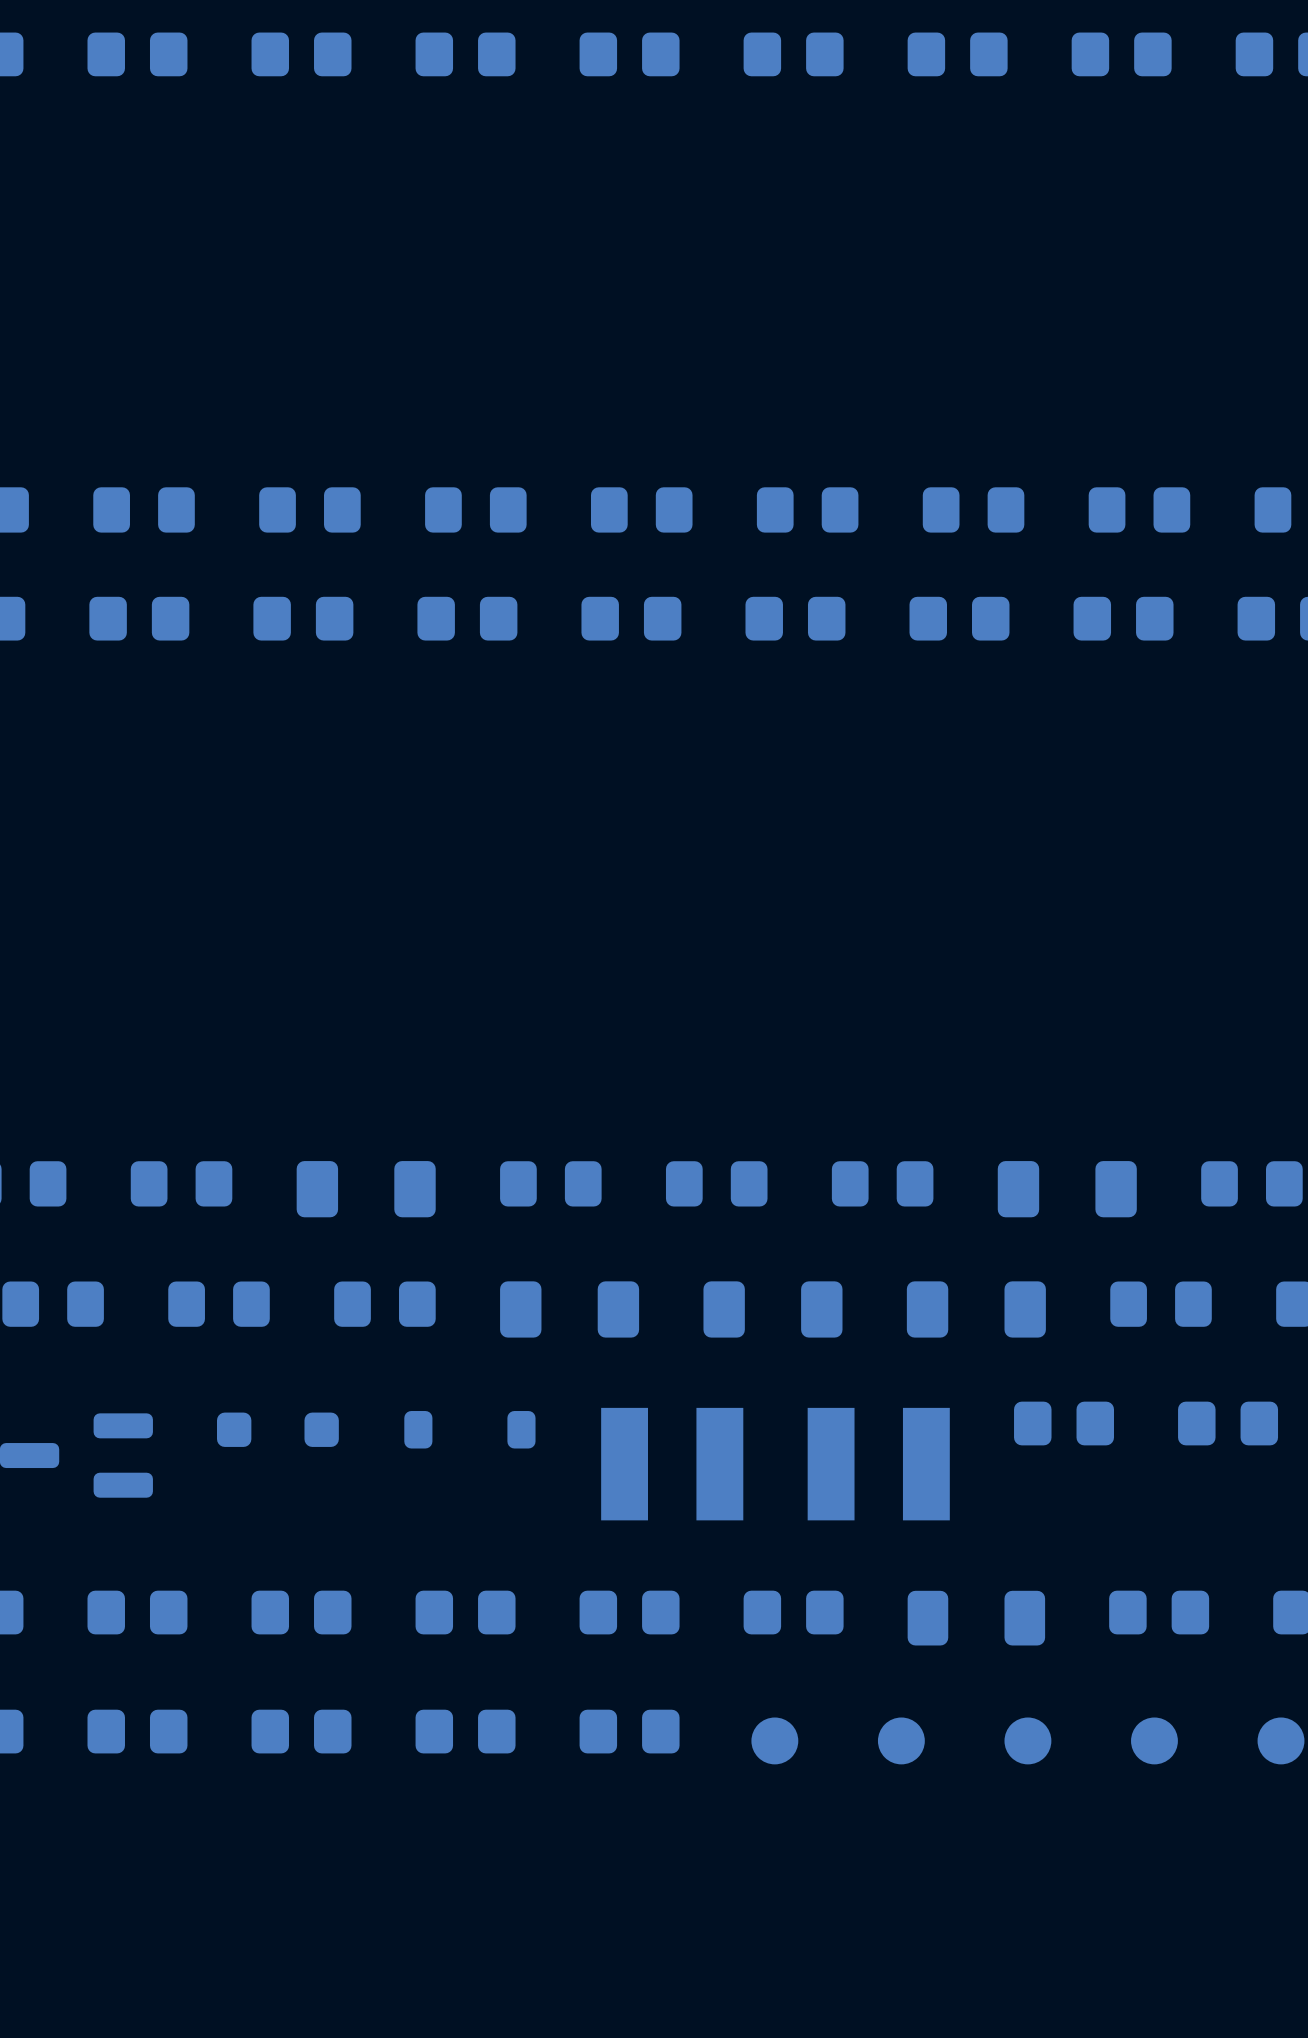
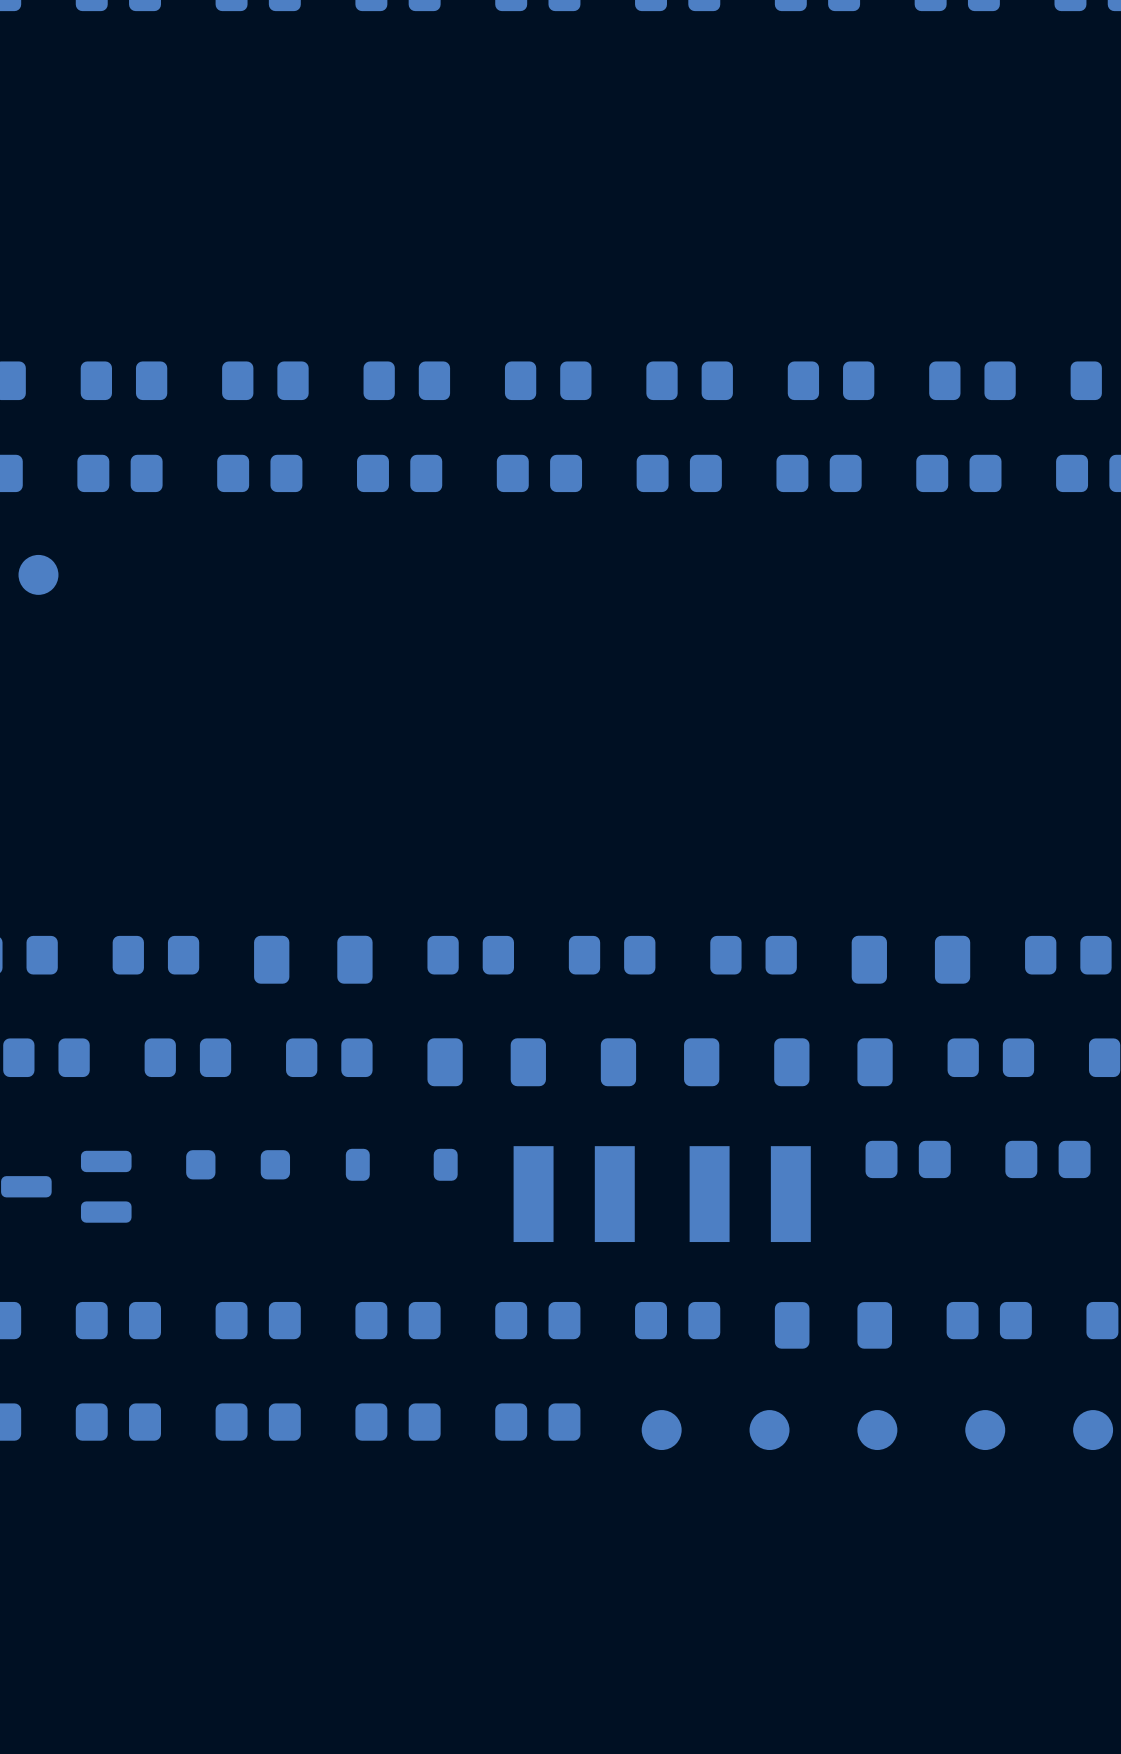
part: none -> (38, 574)

